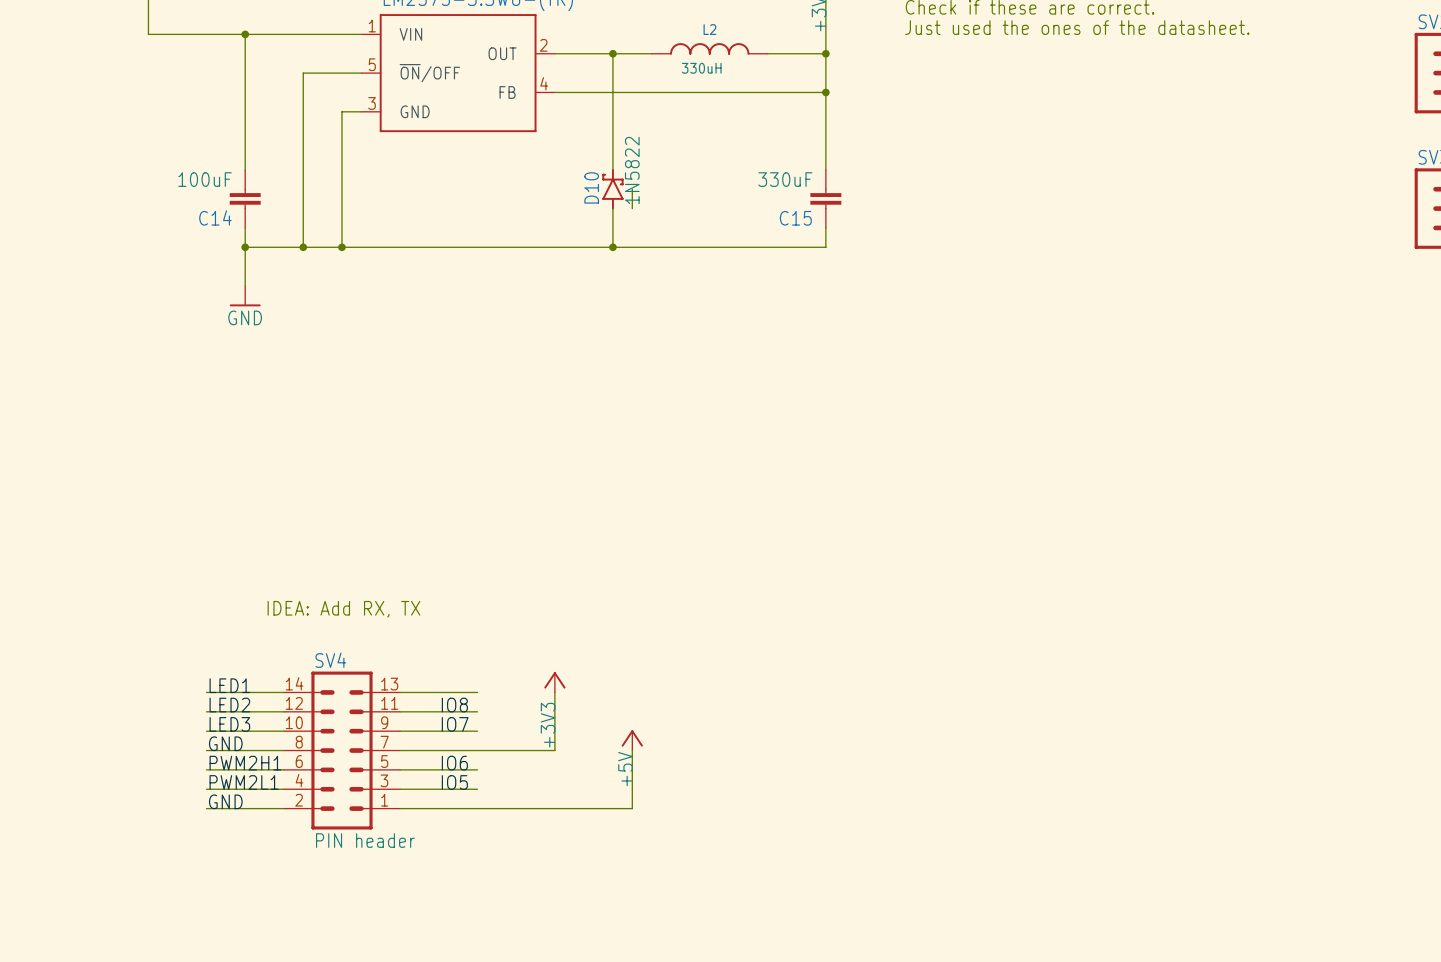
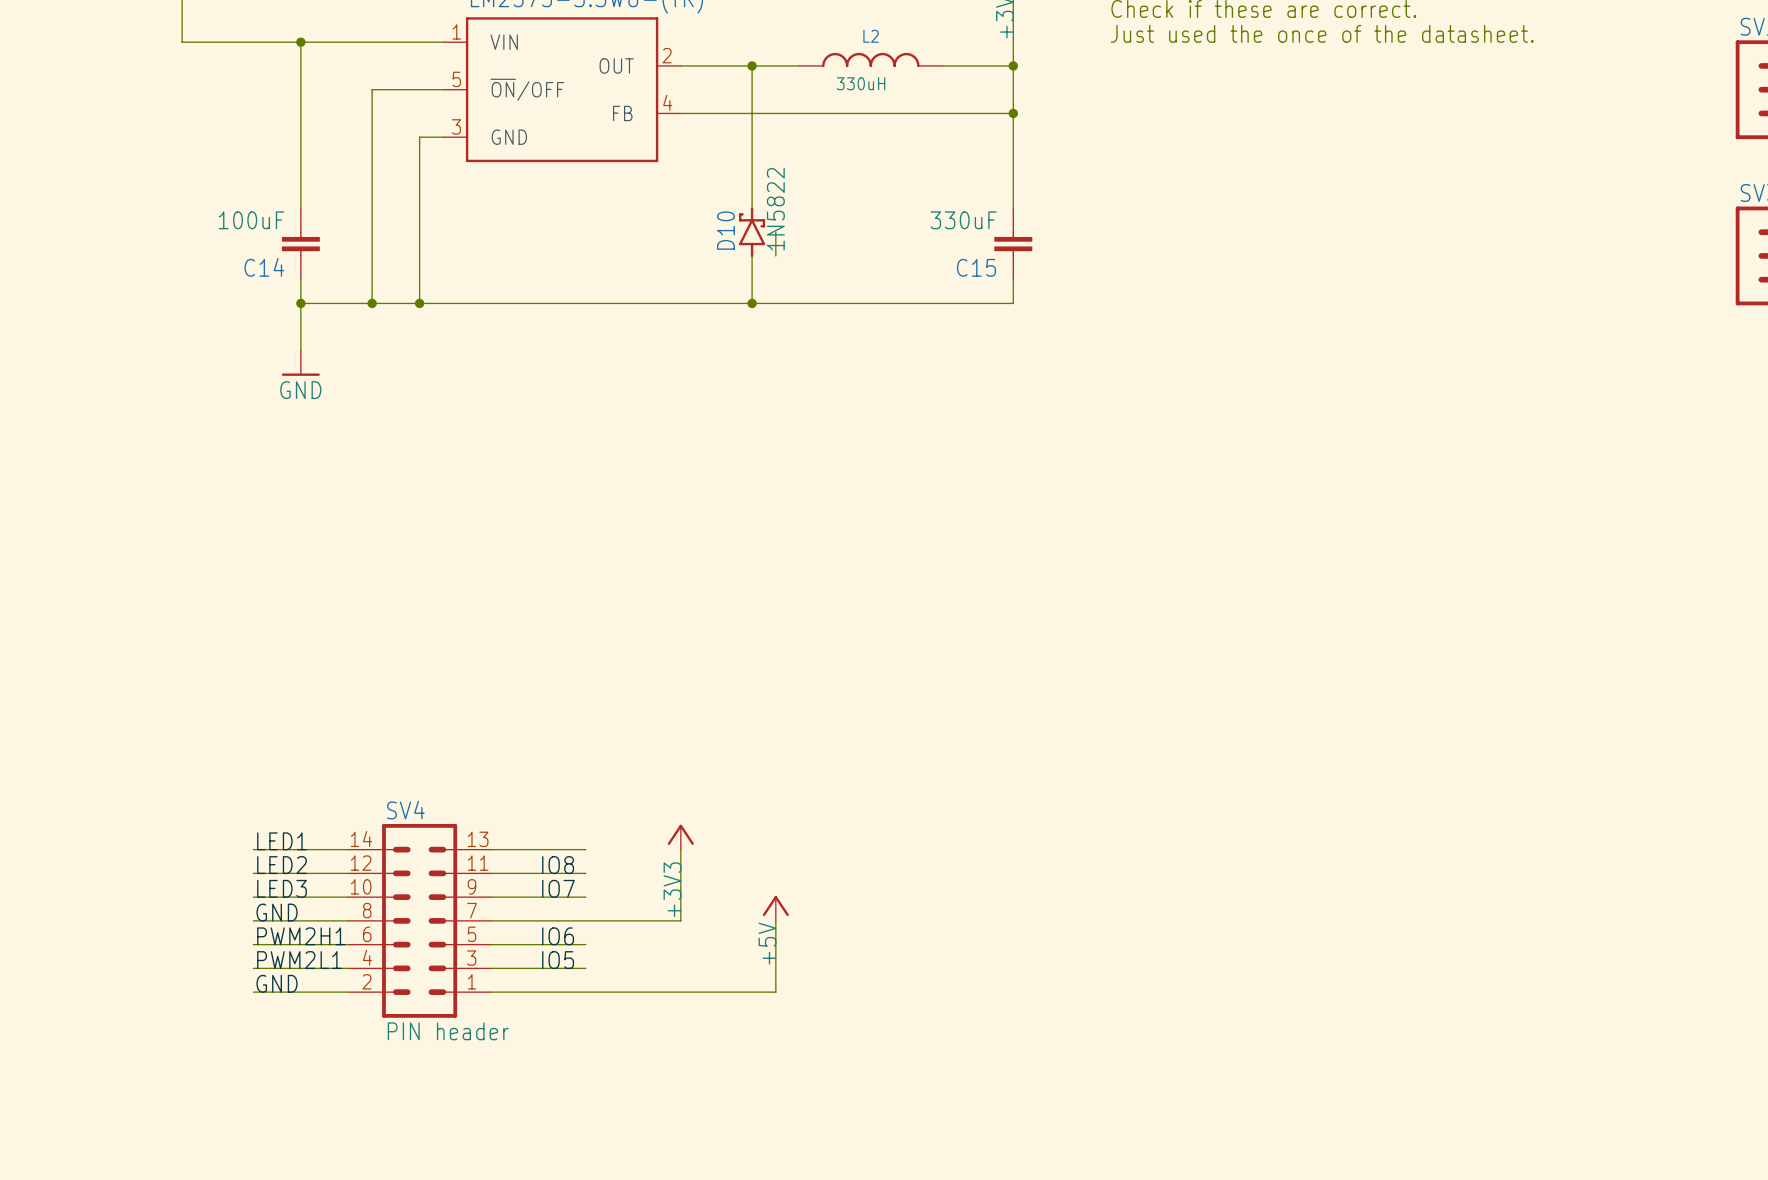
text: Just used the ones of the datasheet. (1077, 27) -> Just used the once of the datasheet. (1322, 33)
text: IDEA: Add RX, TX (343, 609) -> none

